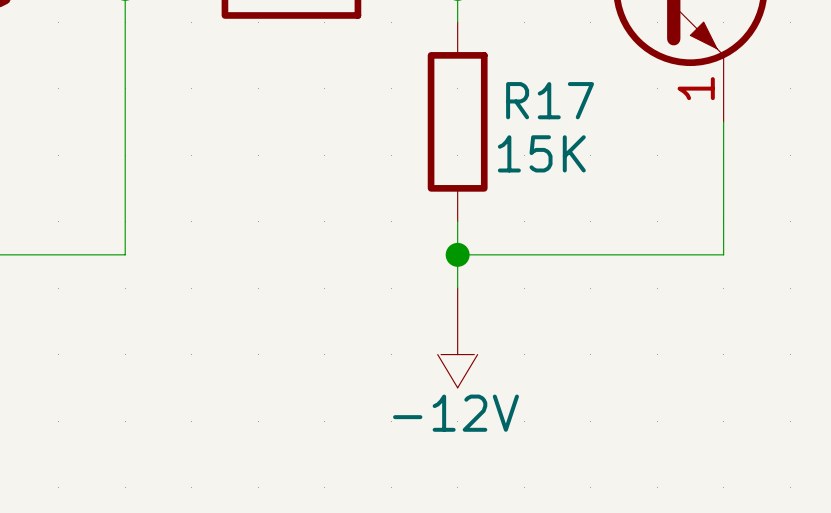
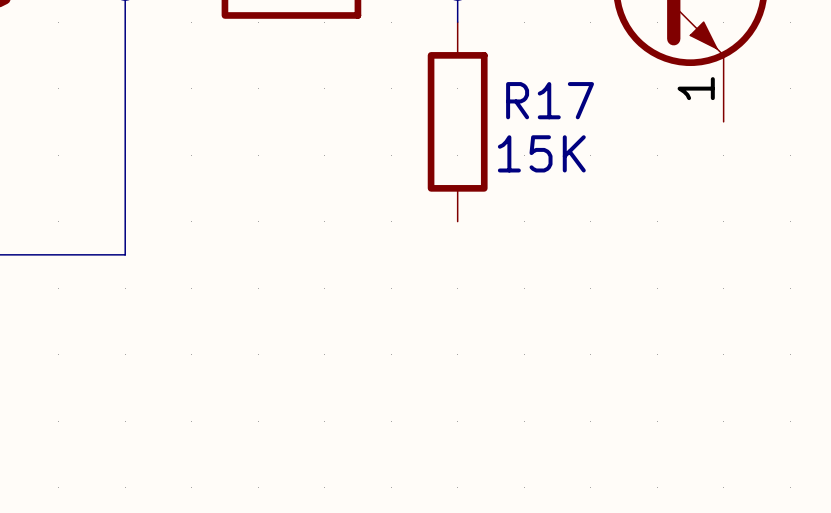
wire: (723, 121) (723, 254) (457, 254) -> none
wire: (457, 221) (457, 288) -> none
junction: (457, 254) -> none
part: -12V (457, 337) -> none

